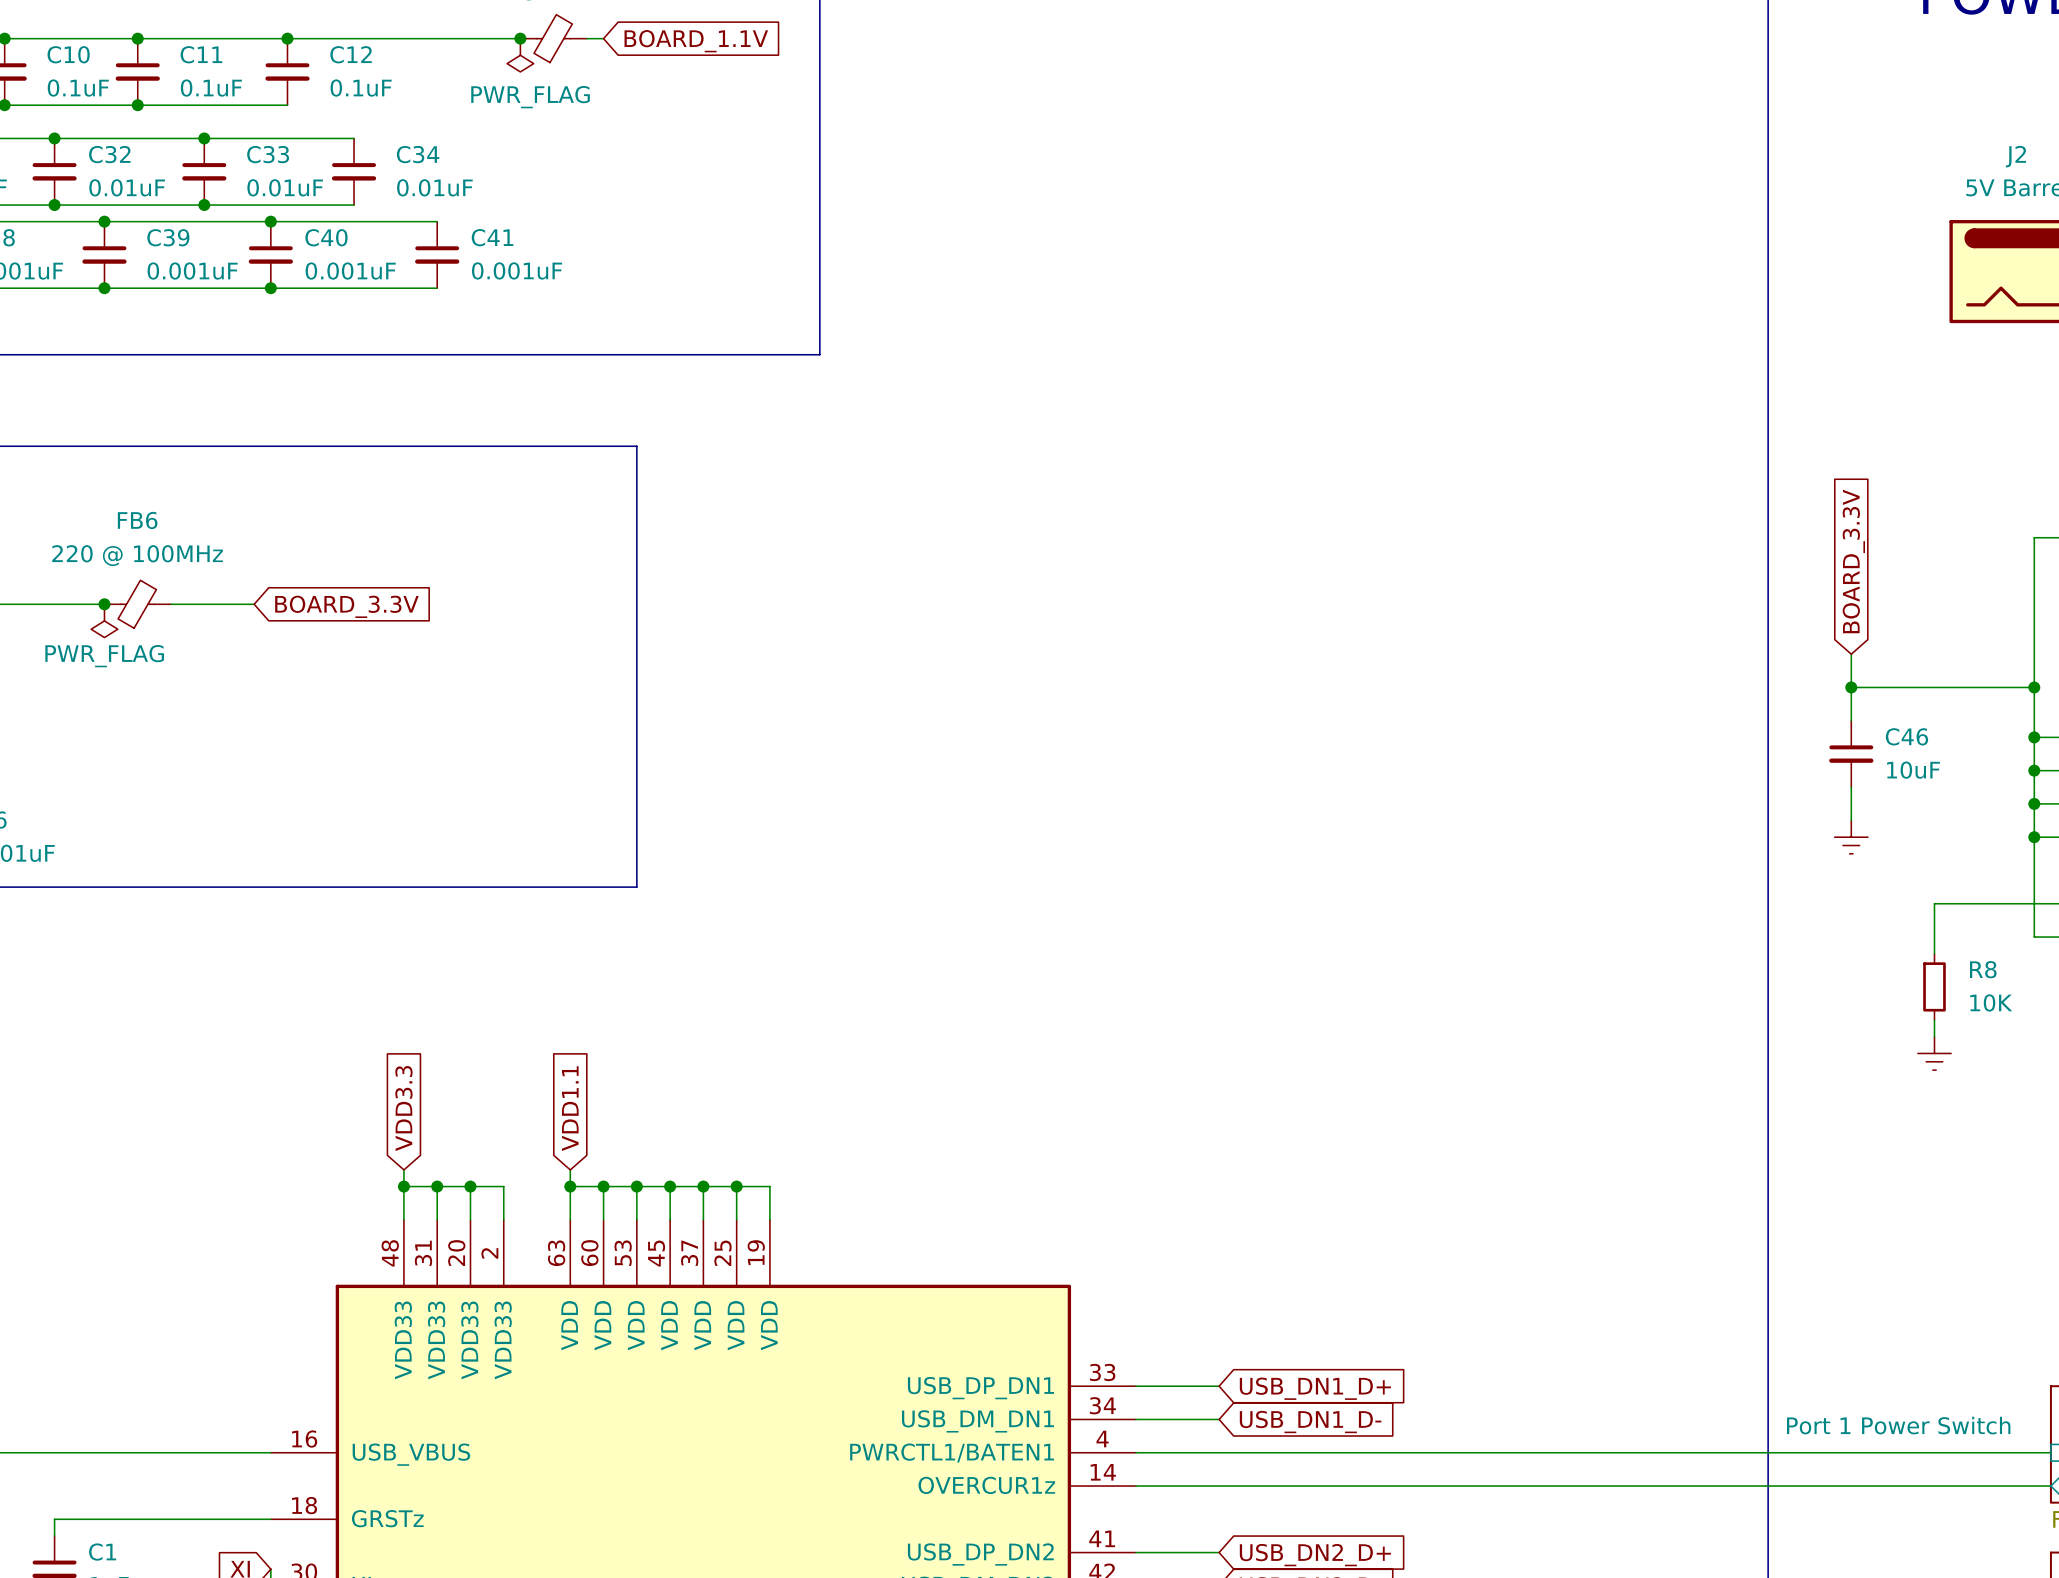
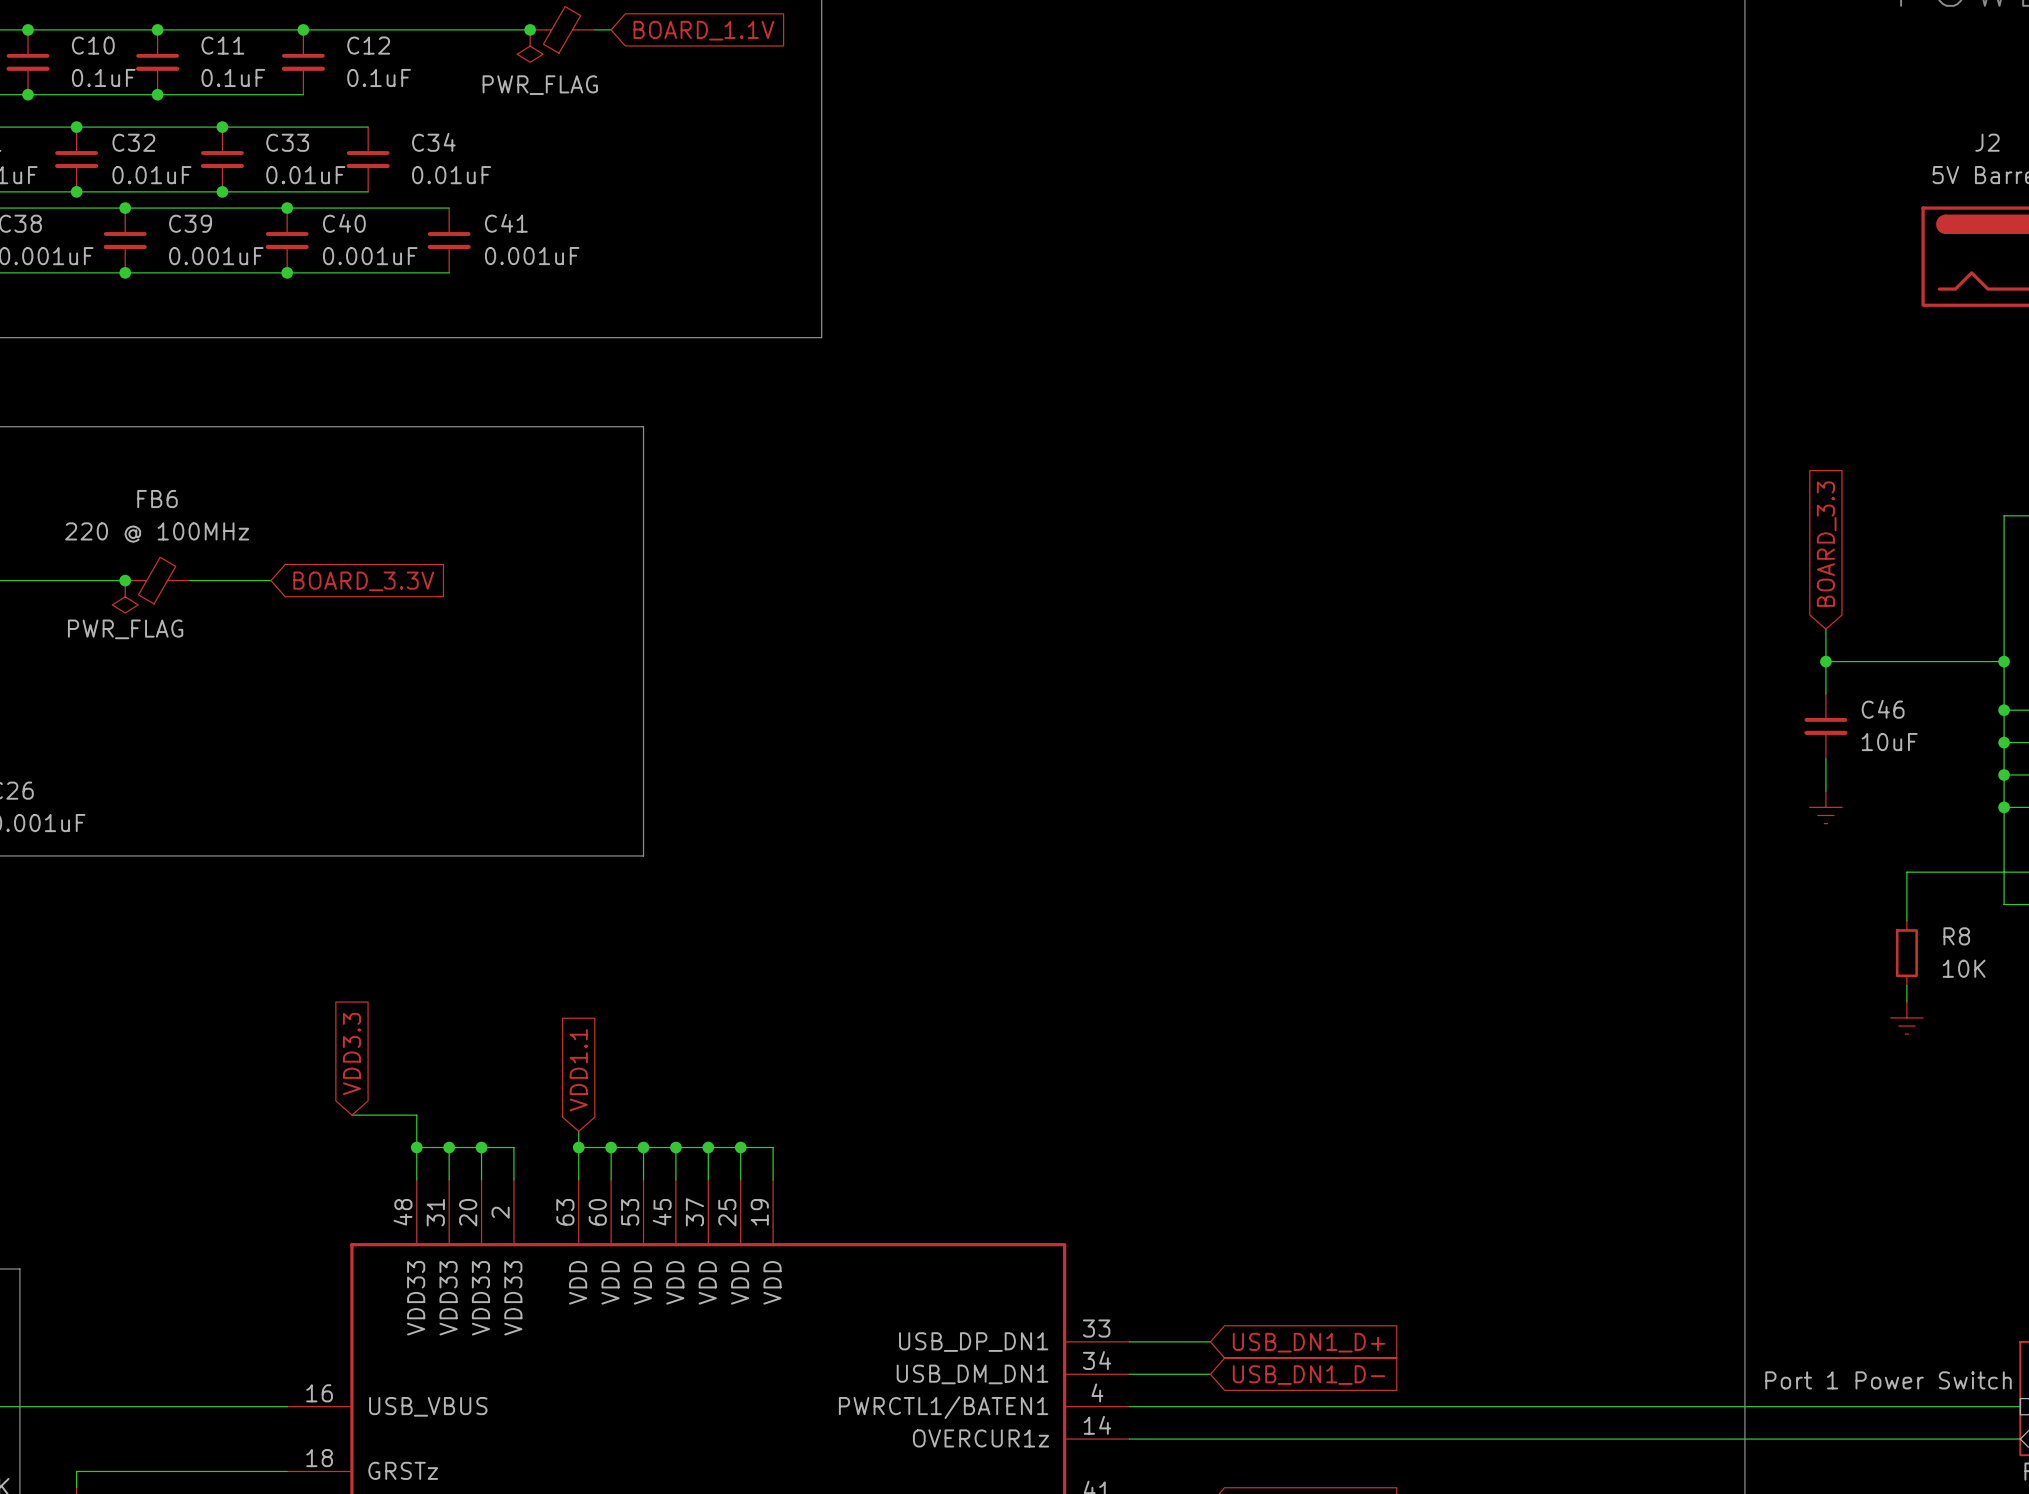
global label: BOARD_3.3V (1853, 561) -> BOARD_3.3 (1826, 544)
global label position: VDD3.3 (403, 1108) -> VDD3.3 (351, 1053)
wire: none -> (351, 1115) (416, 1115) (416, 1131)

